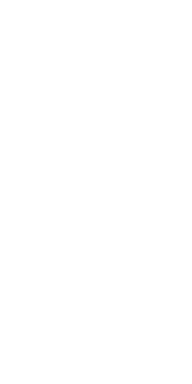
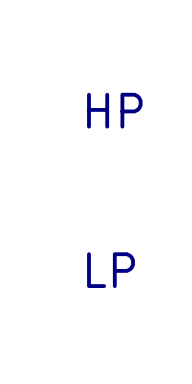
text: none -> HP (114, 110)
text: none -> LP (111, 270)

